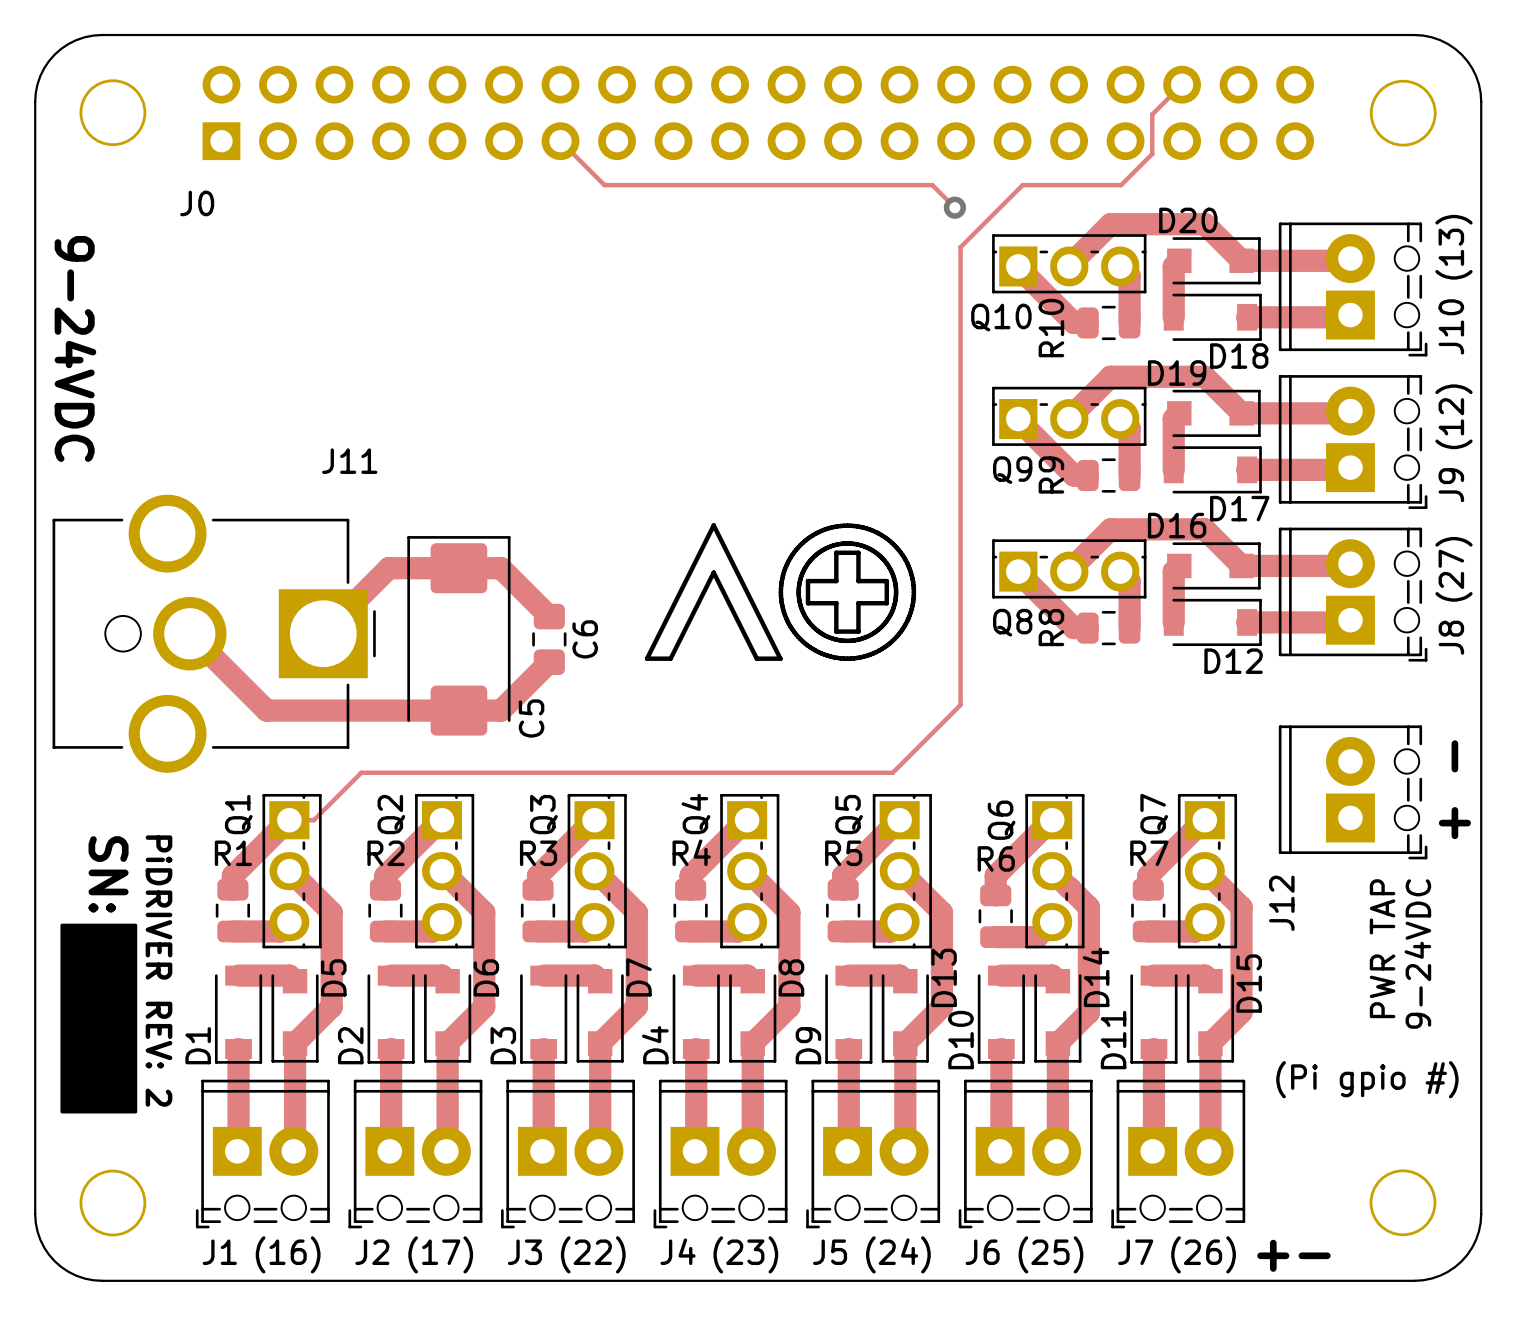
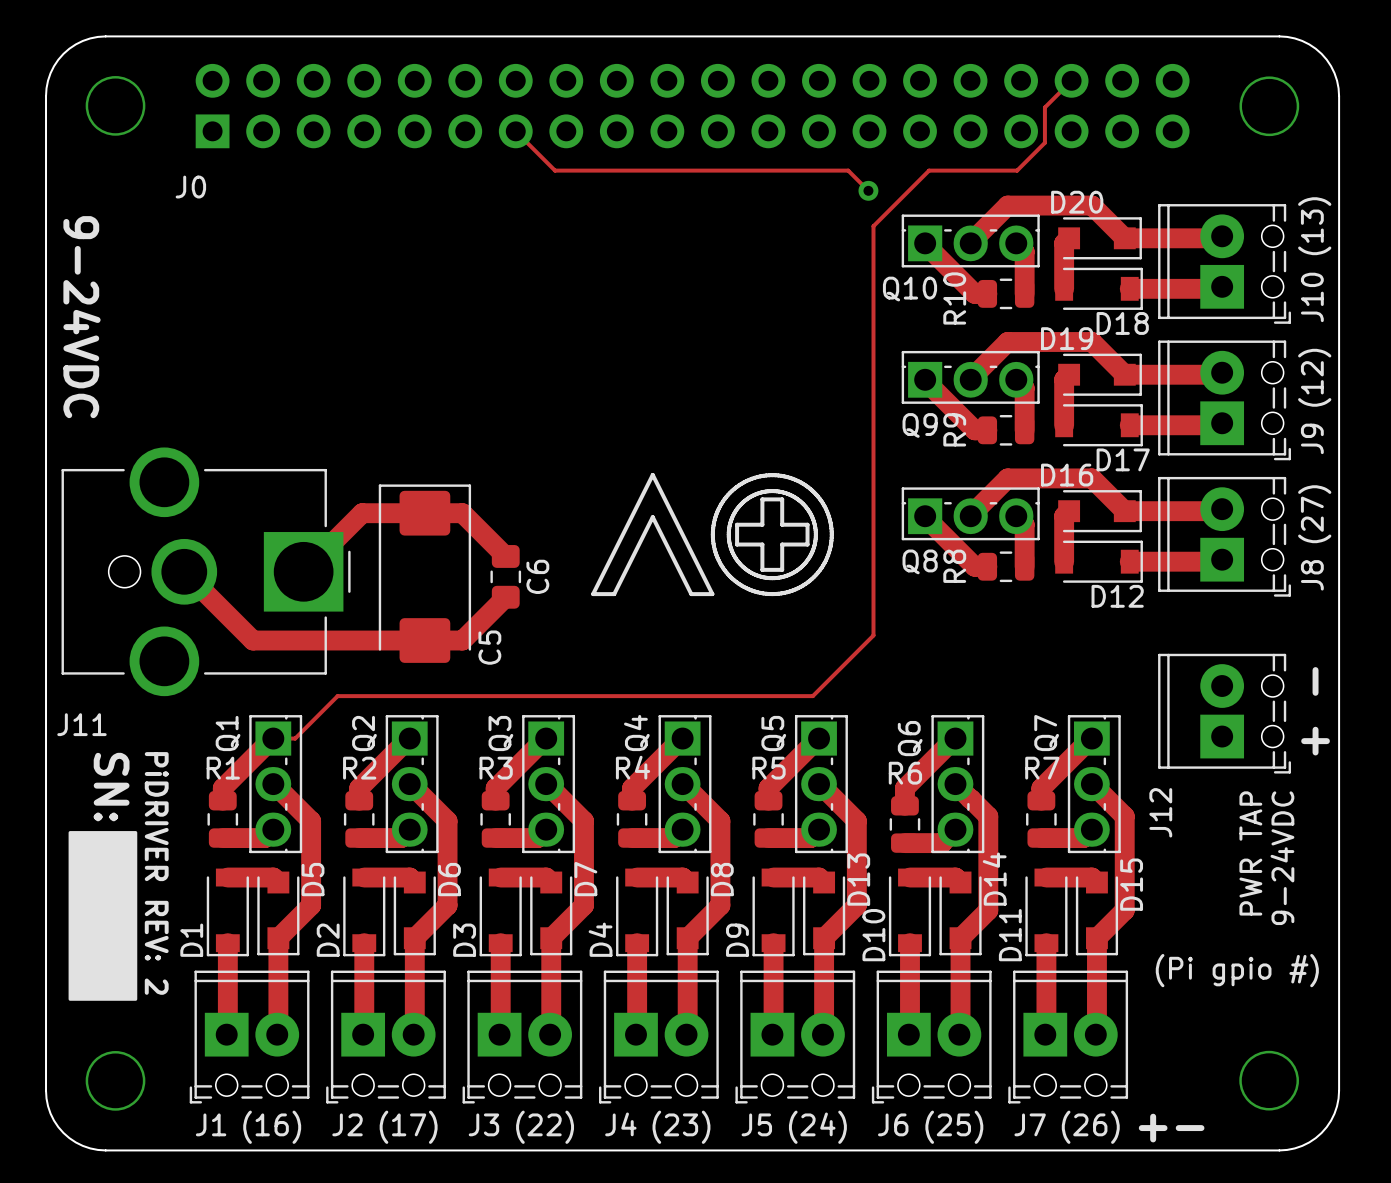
J11 name position: J11 (349, 461) -> J11 (81, 724)

